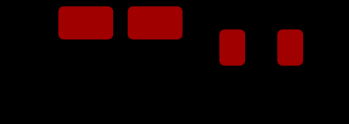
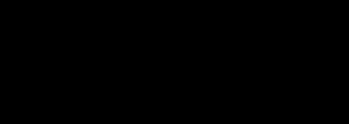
part: (120, 22) -> none
part: (261, 47) -> none

